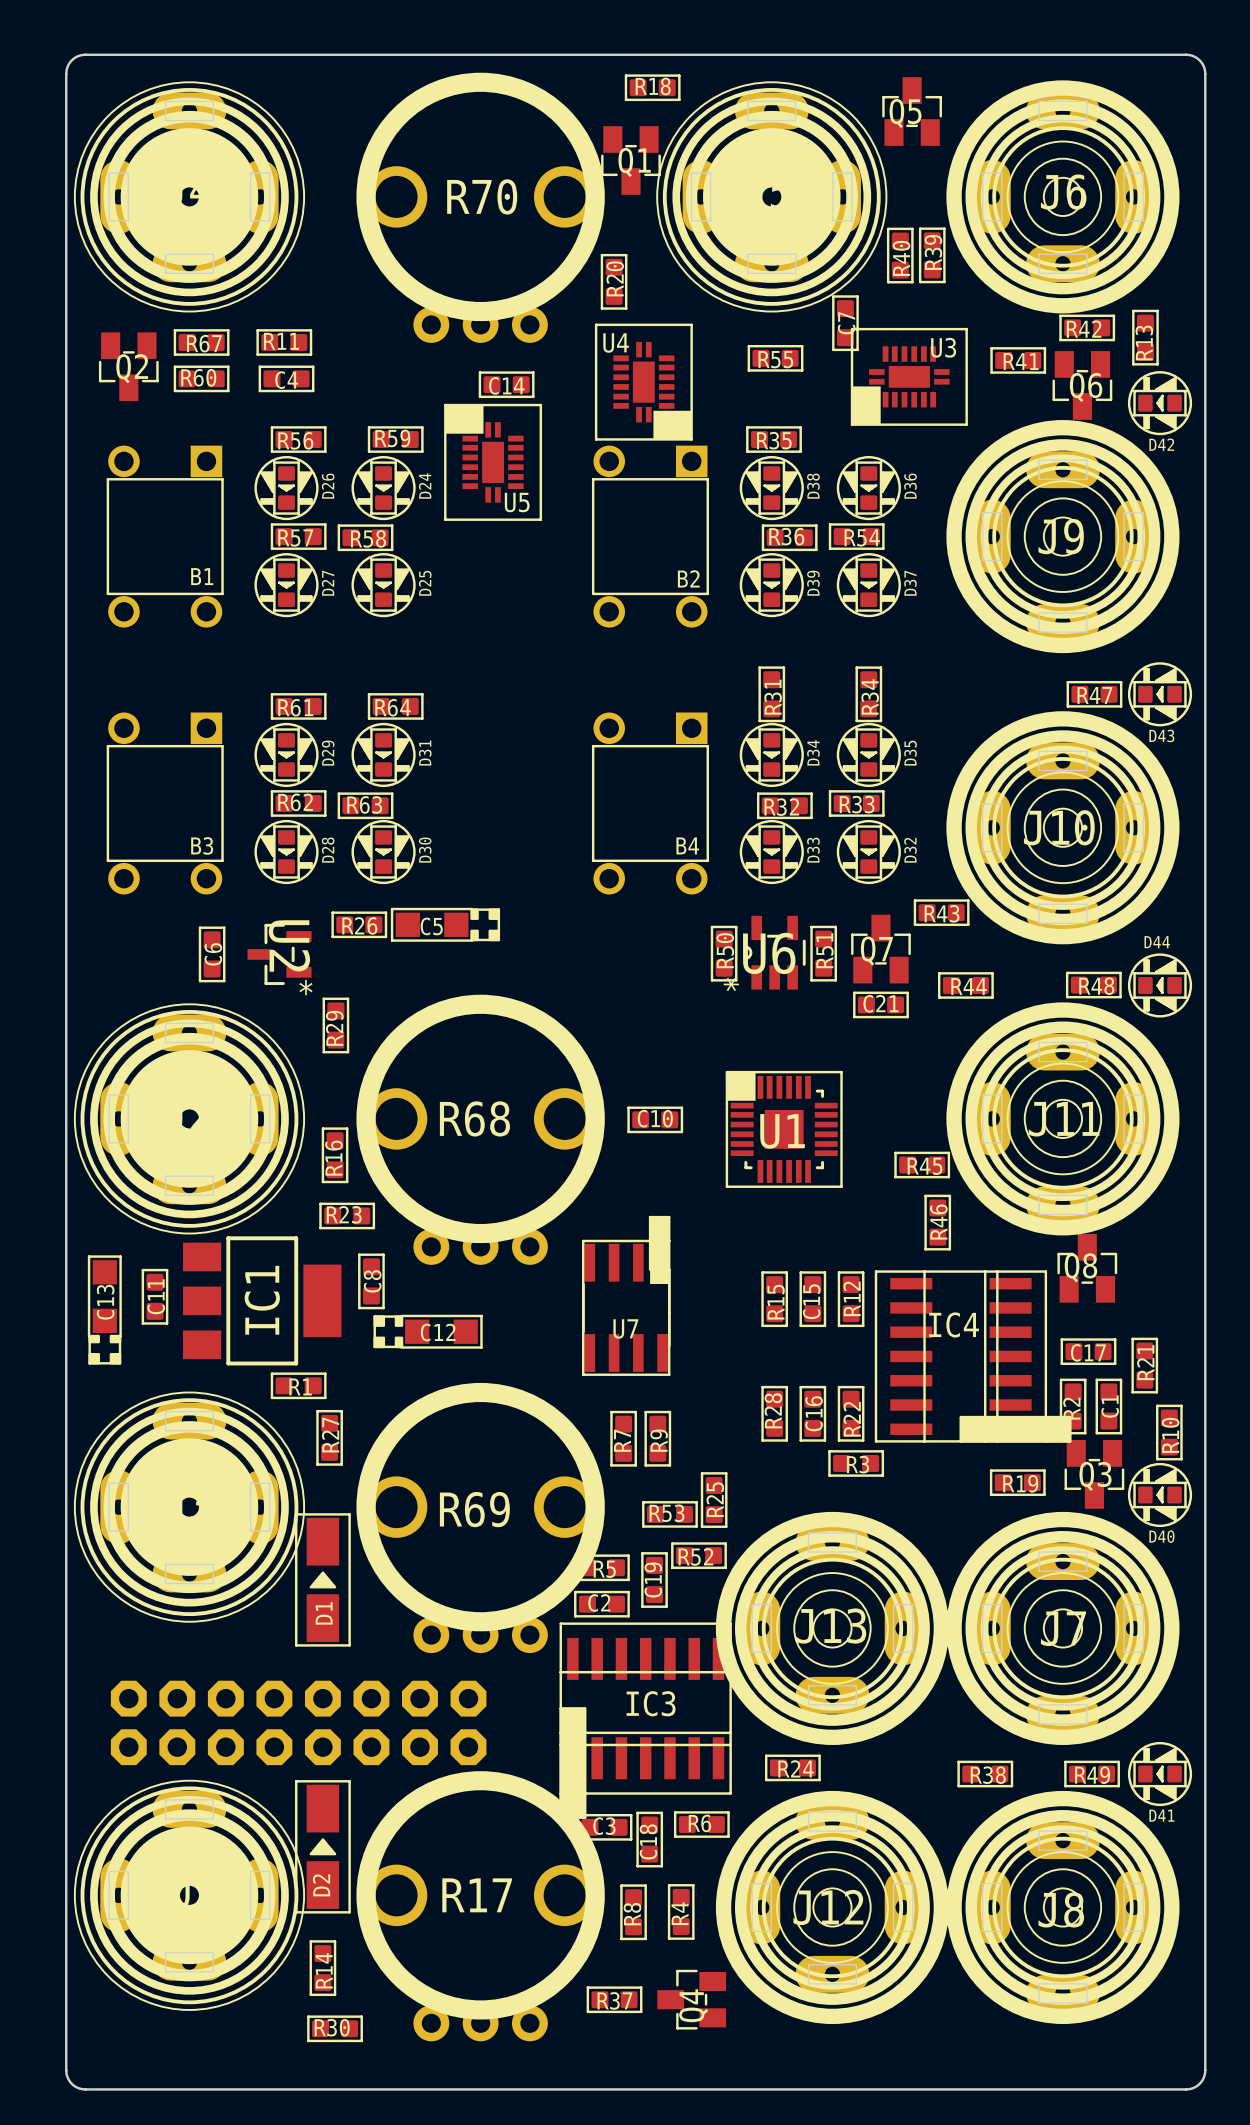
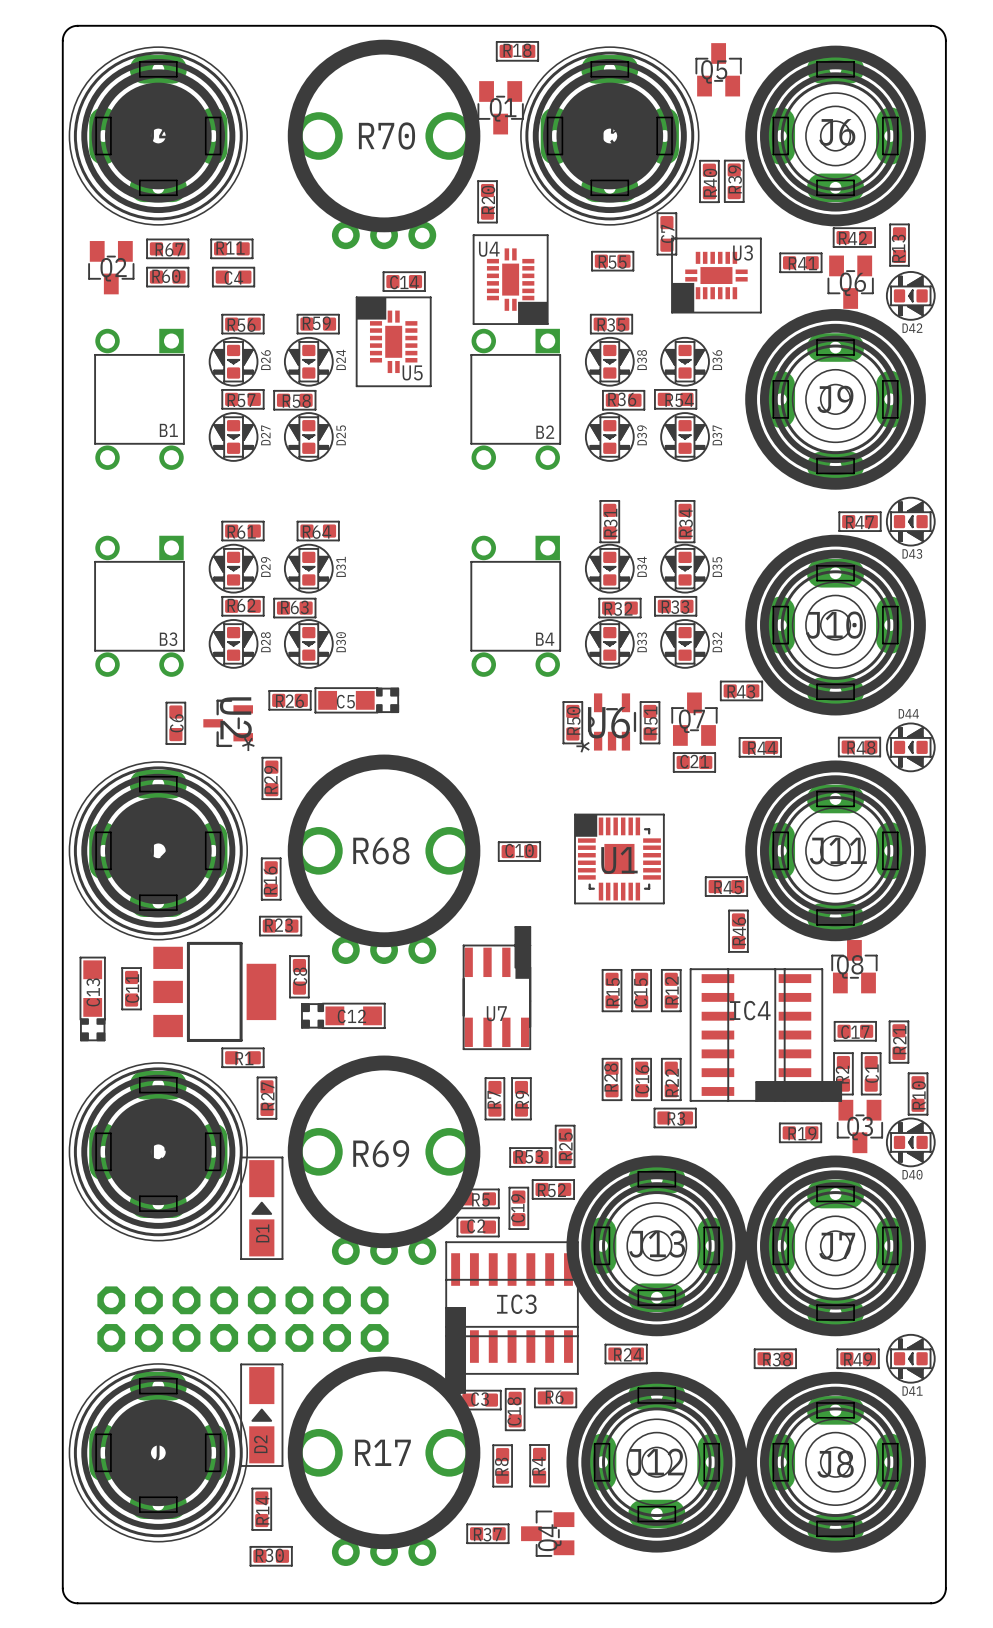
text: IC1 (262, 1300) -> none

